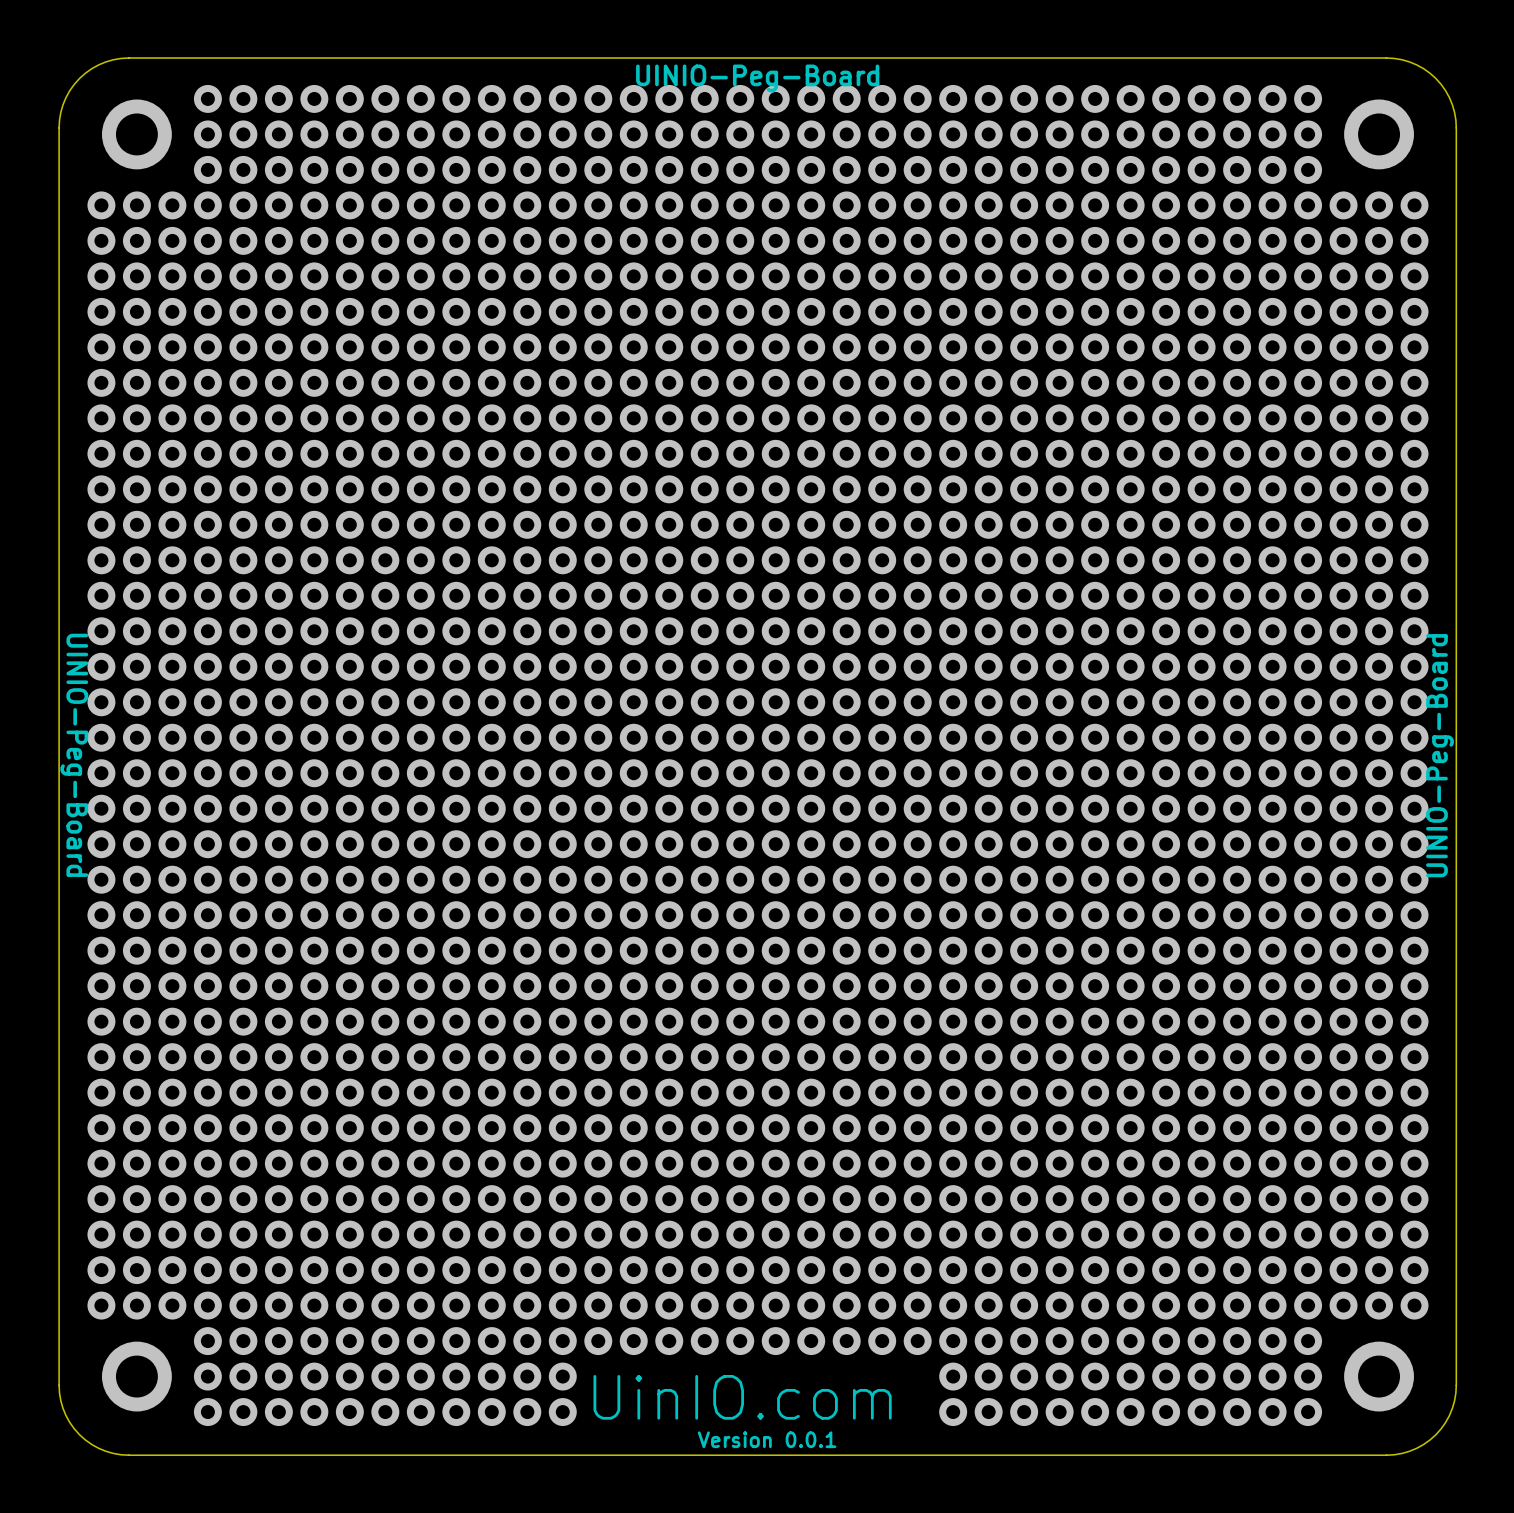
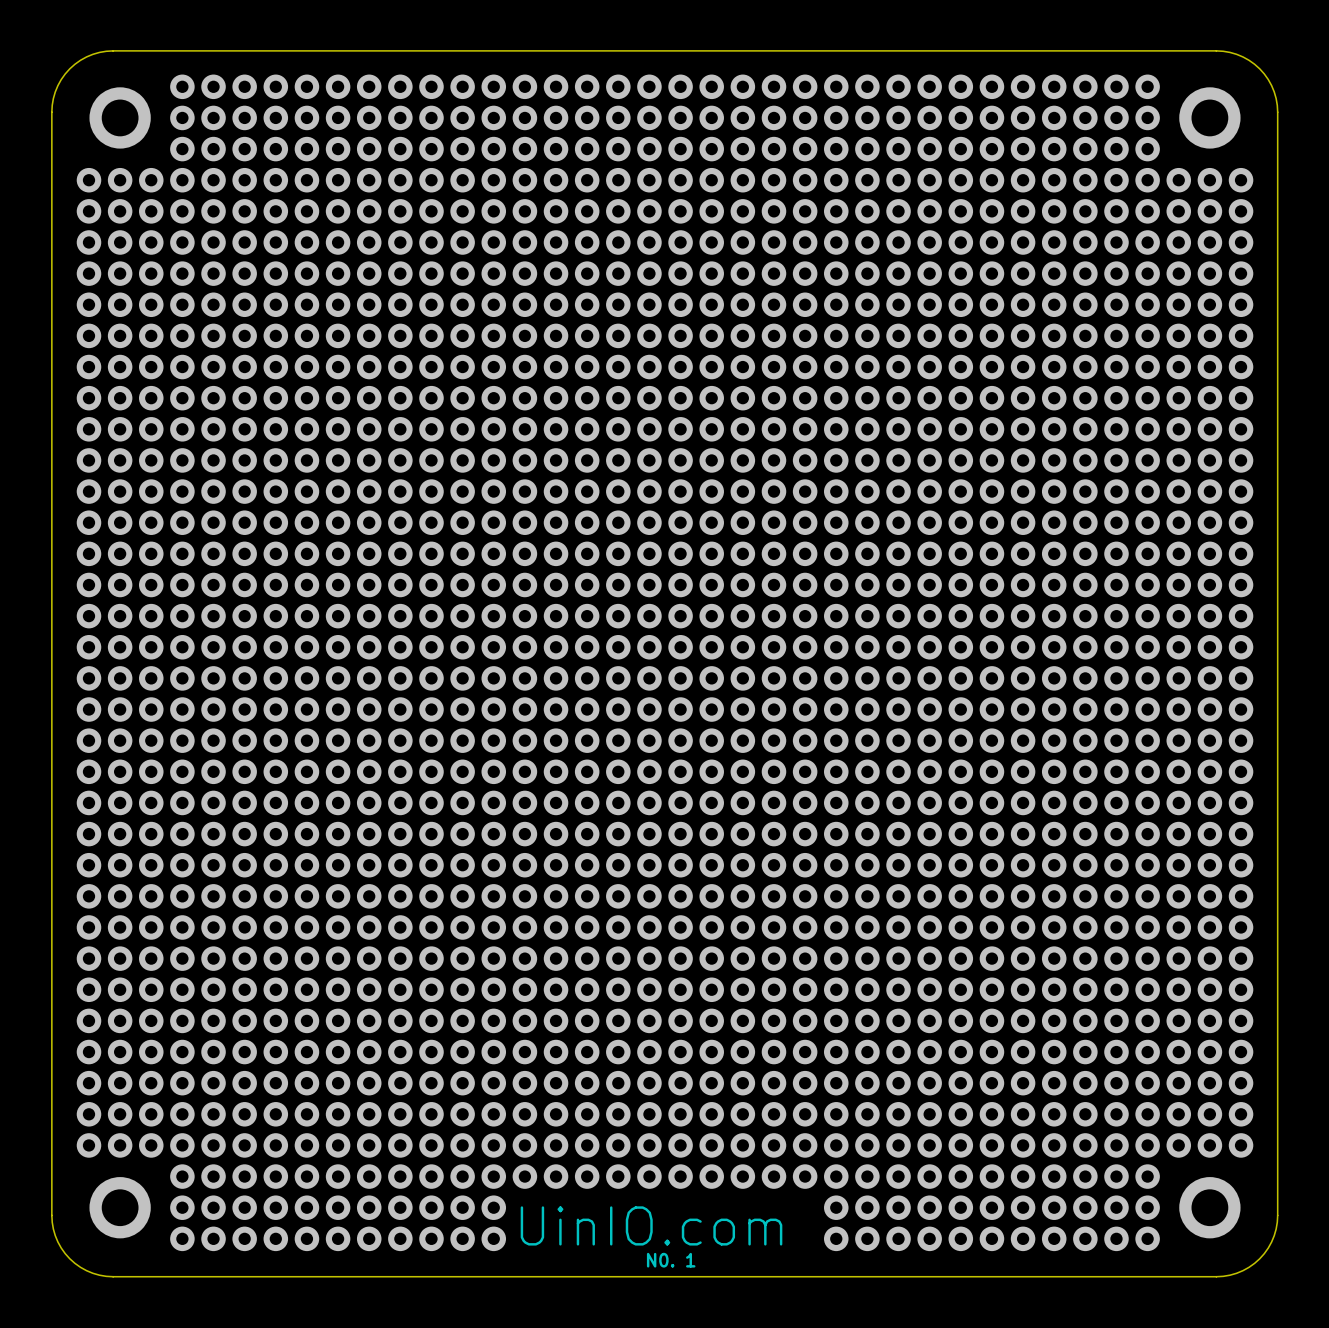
text: UINIO-Peg-Board (757, 78) -> none
text: UINIO-Peg-Board (74, 755) -> none
text: UINIO-Peg-Board (1439, 755) -> none
text: none -> N0. 1 (671, 1260)
text: Version 0.0.1 (767, 1439) -> none

